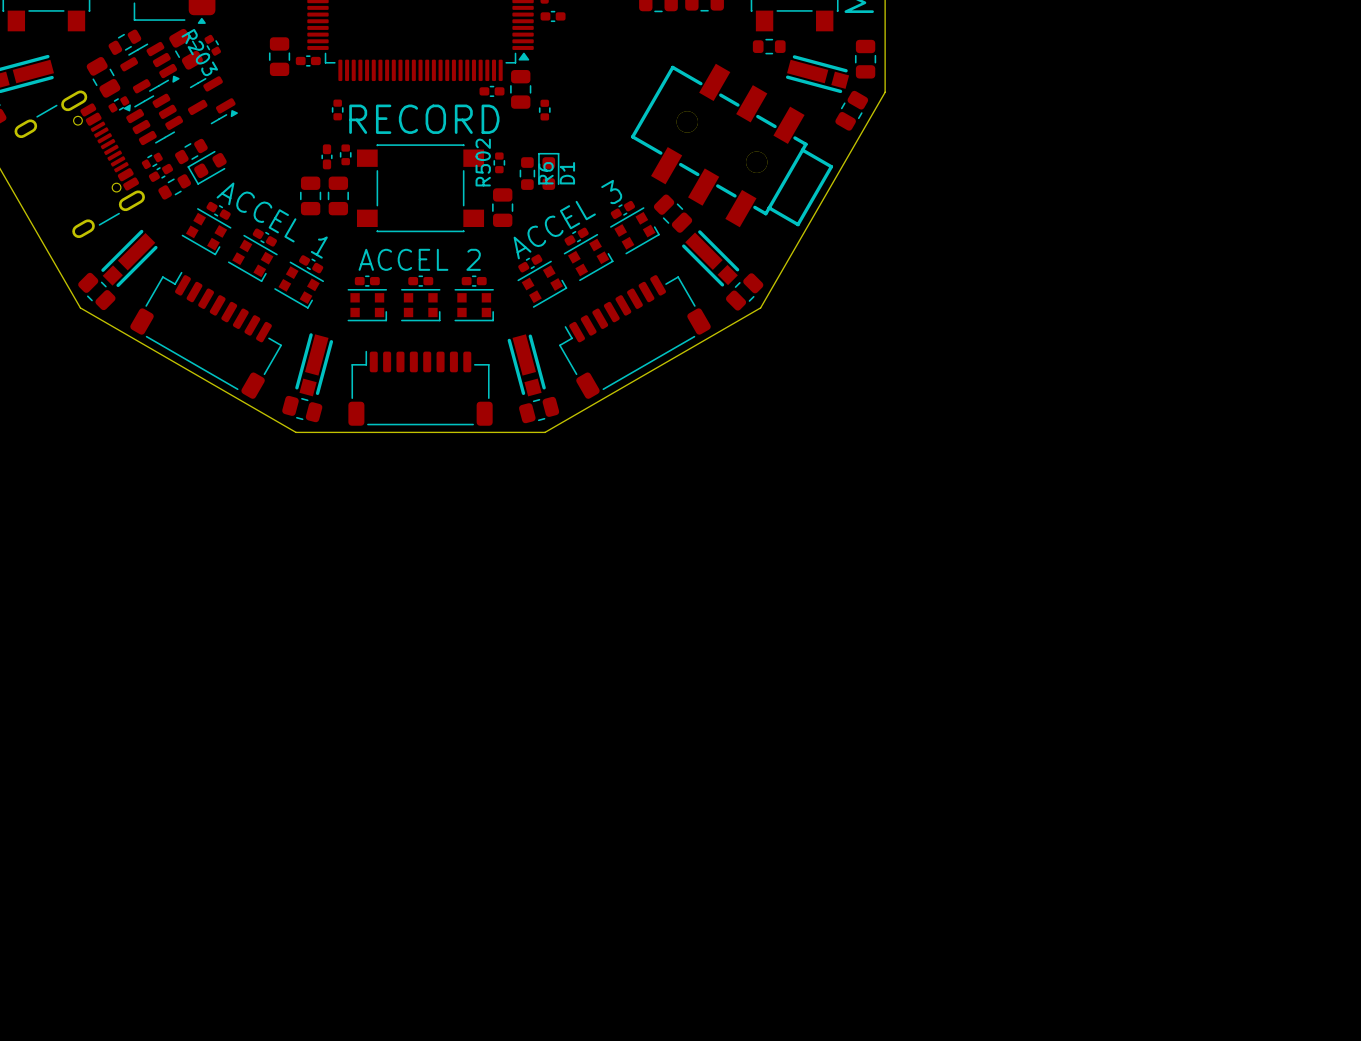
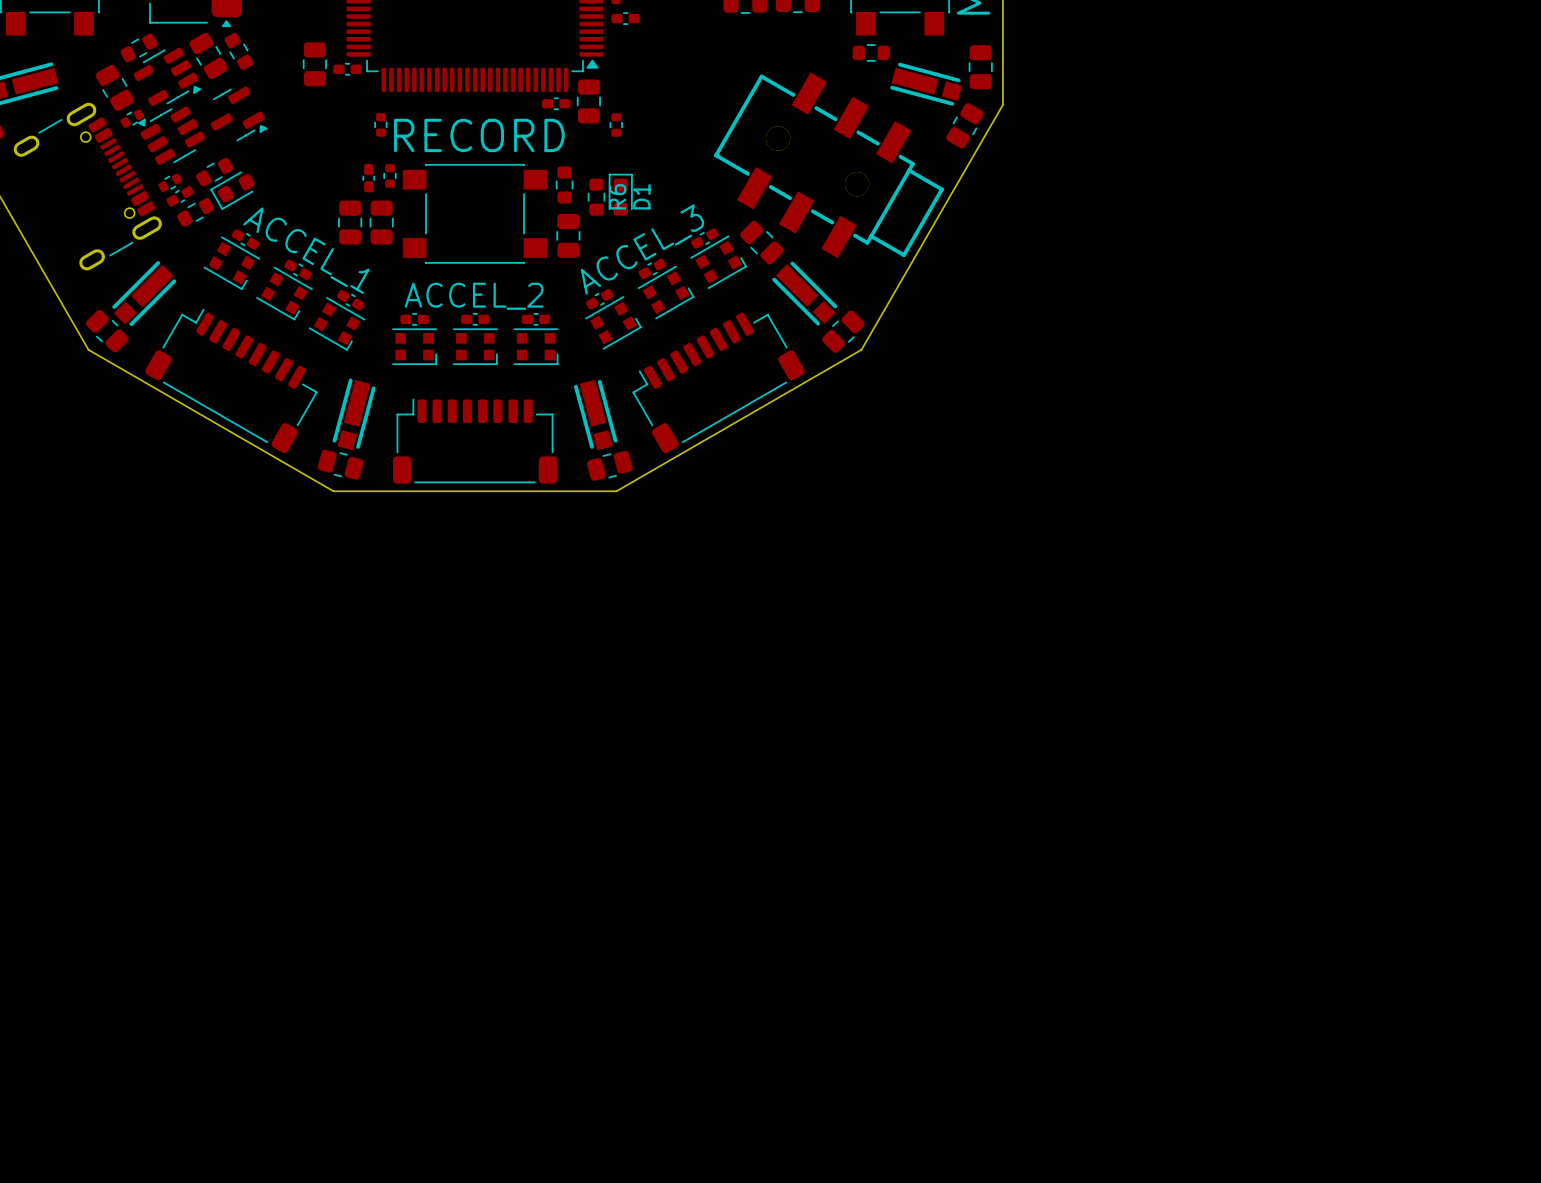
R203: (212, 45) -> none
part: none -> (238, 51)
R502: (499, 162) -> none
part: none -> (564, 185)
text: ACCEL 3 (567, 219) -> ACCEL_3 (642, 249)
text: ACCEL 1 (272, 220) -> ACCEL_1 (306, 250)
text: ACCEL 2 (419, 259) -> ACCEL_2 (474, 296)

